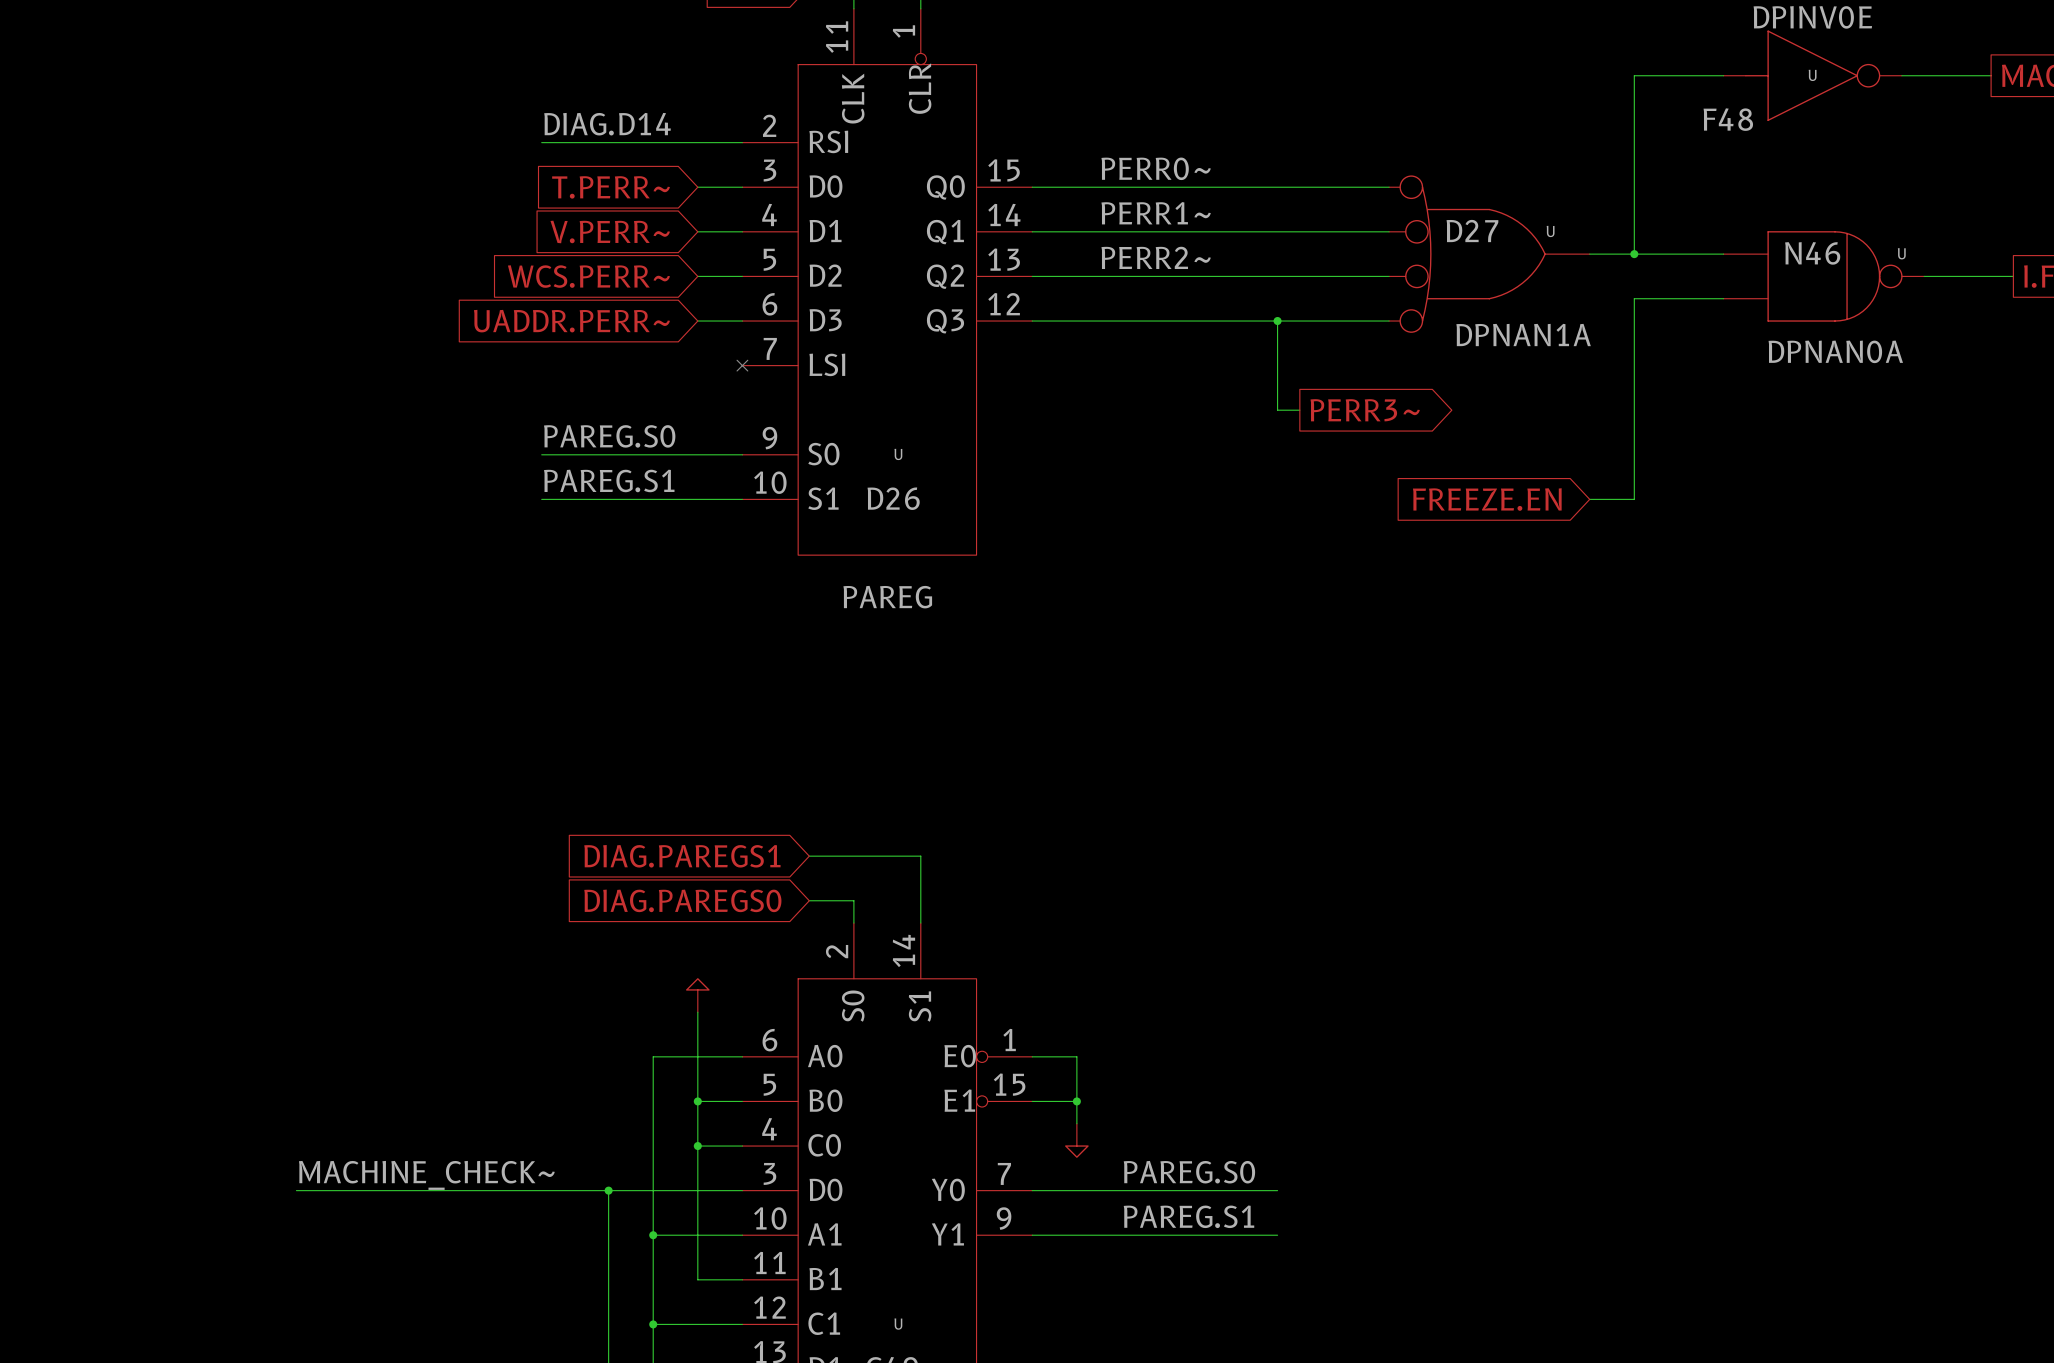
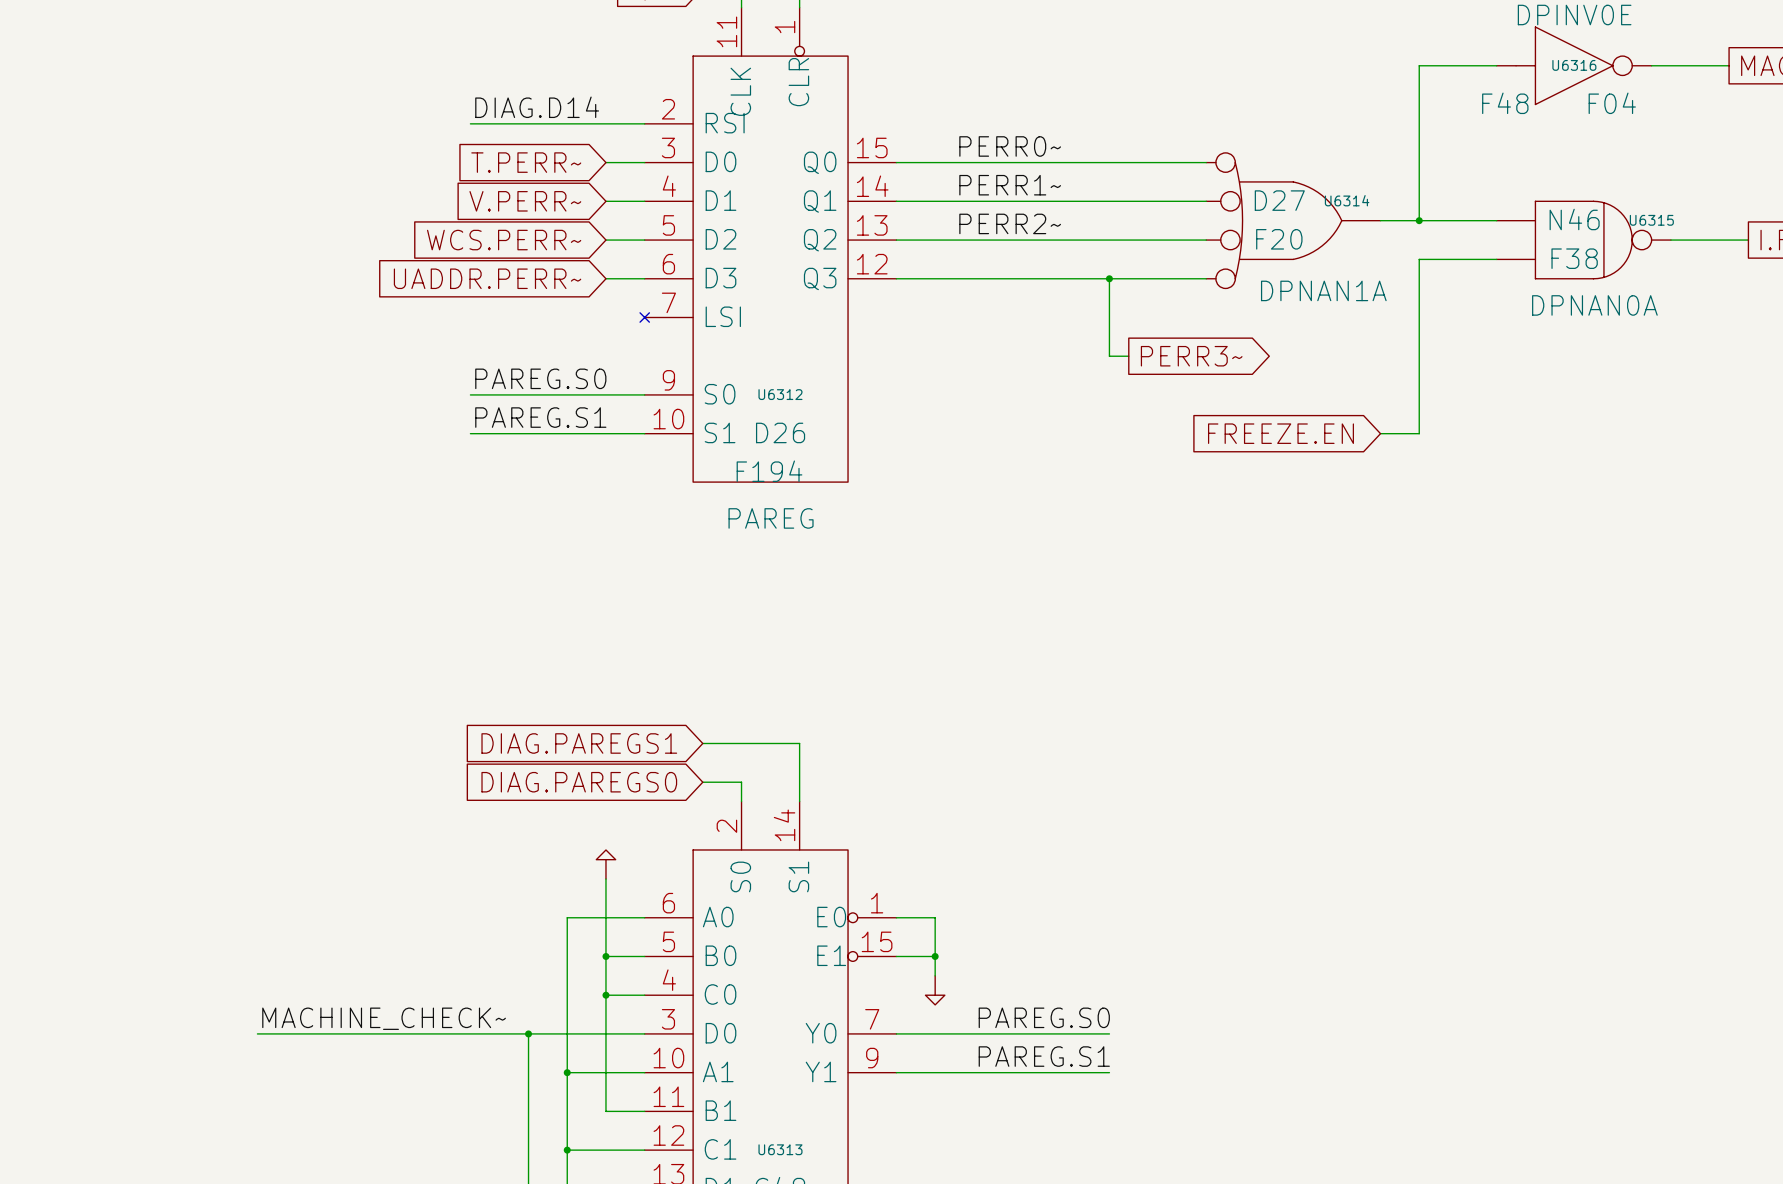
U name: U (1812, 75) -> U6316 (1574, 65)
U value: none -> F04 (1612, 103)
U name: U (1550, 231) -> U6314 (1347, 200)
U name: U (1901, 253) -> U6315 (1651, 220)
U value: none -> F20 (1279, 239)
U value: none -> F38 (1574, 258)
U name: U (898, 454) -> U6312 (780, 394)
U value: none -> F194 (769, 471)
U name: U (898, 1324) -> U6313 (780, 1149)

